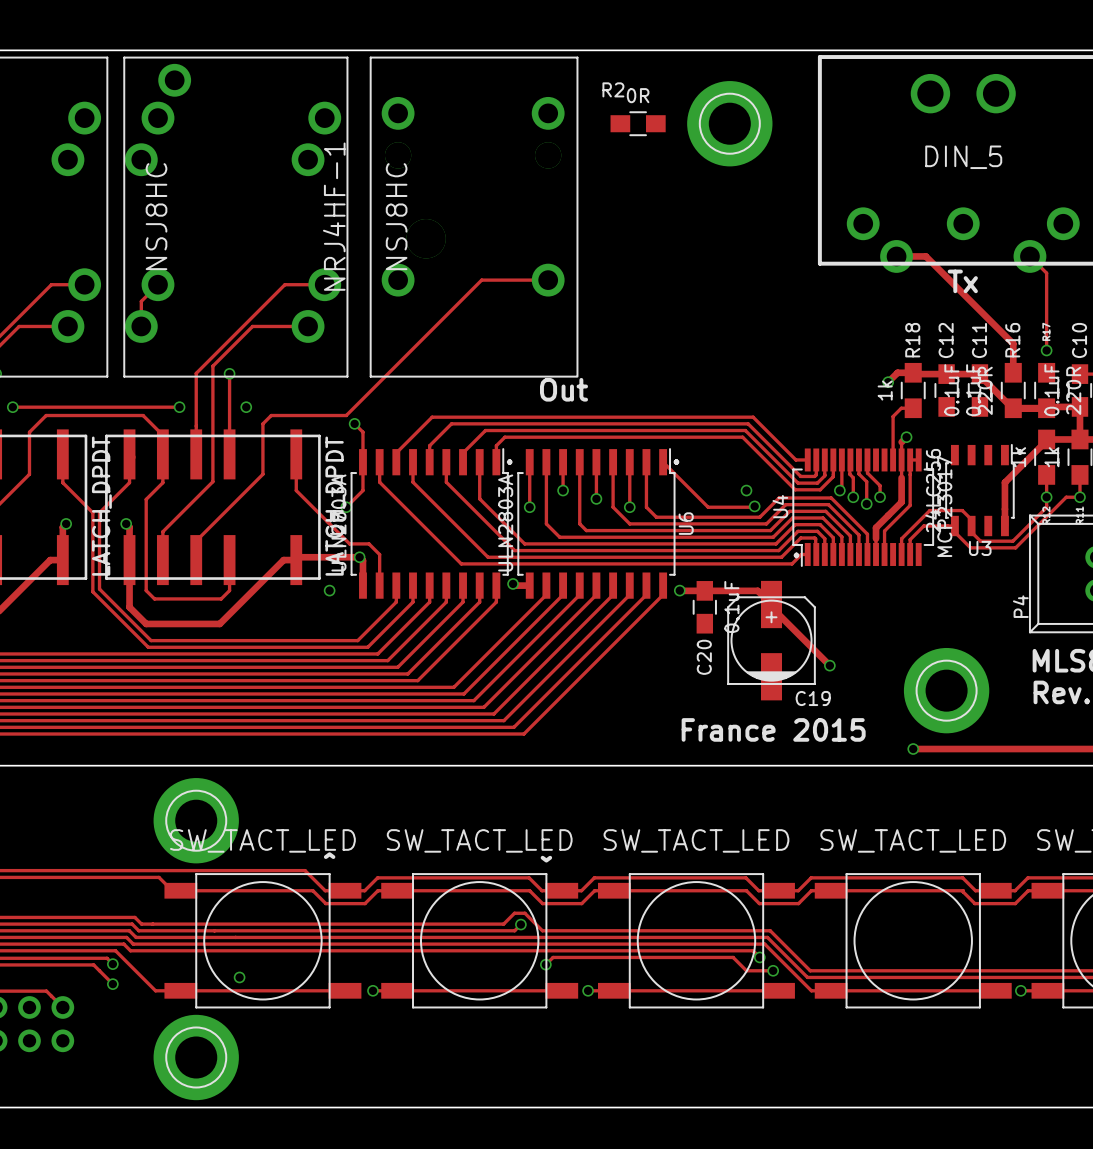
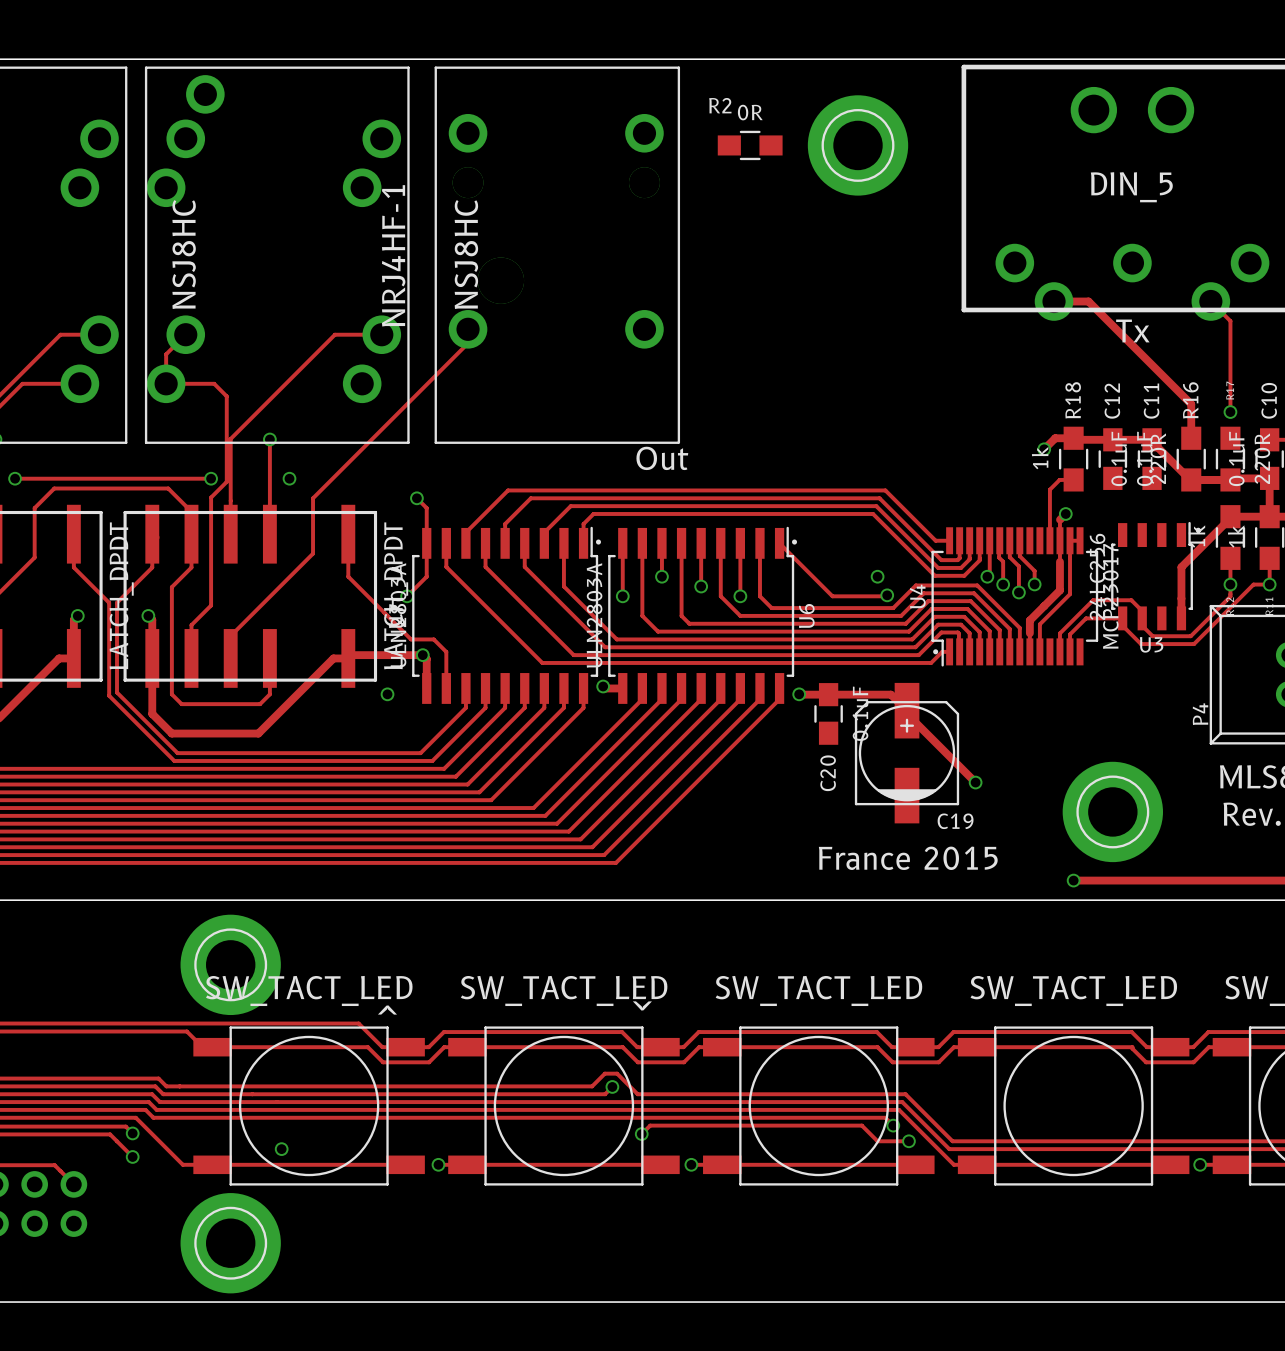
track: (548, 280) (481, 280) (346, 415) (271, 415) (262, 423) (262, 474) -> (468, 329) (468, 343) (313, 498) (313, 553) (309, 557)
track: (308, 326) (252, 326) (212, 366) (212, 481) (179, 515) -> (166, 383) (214, 383) (226, 396) (226, 481) (211, 497) (211, 605)

